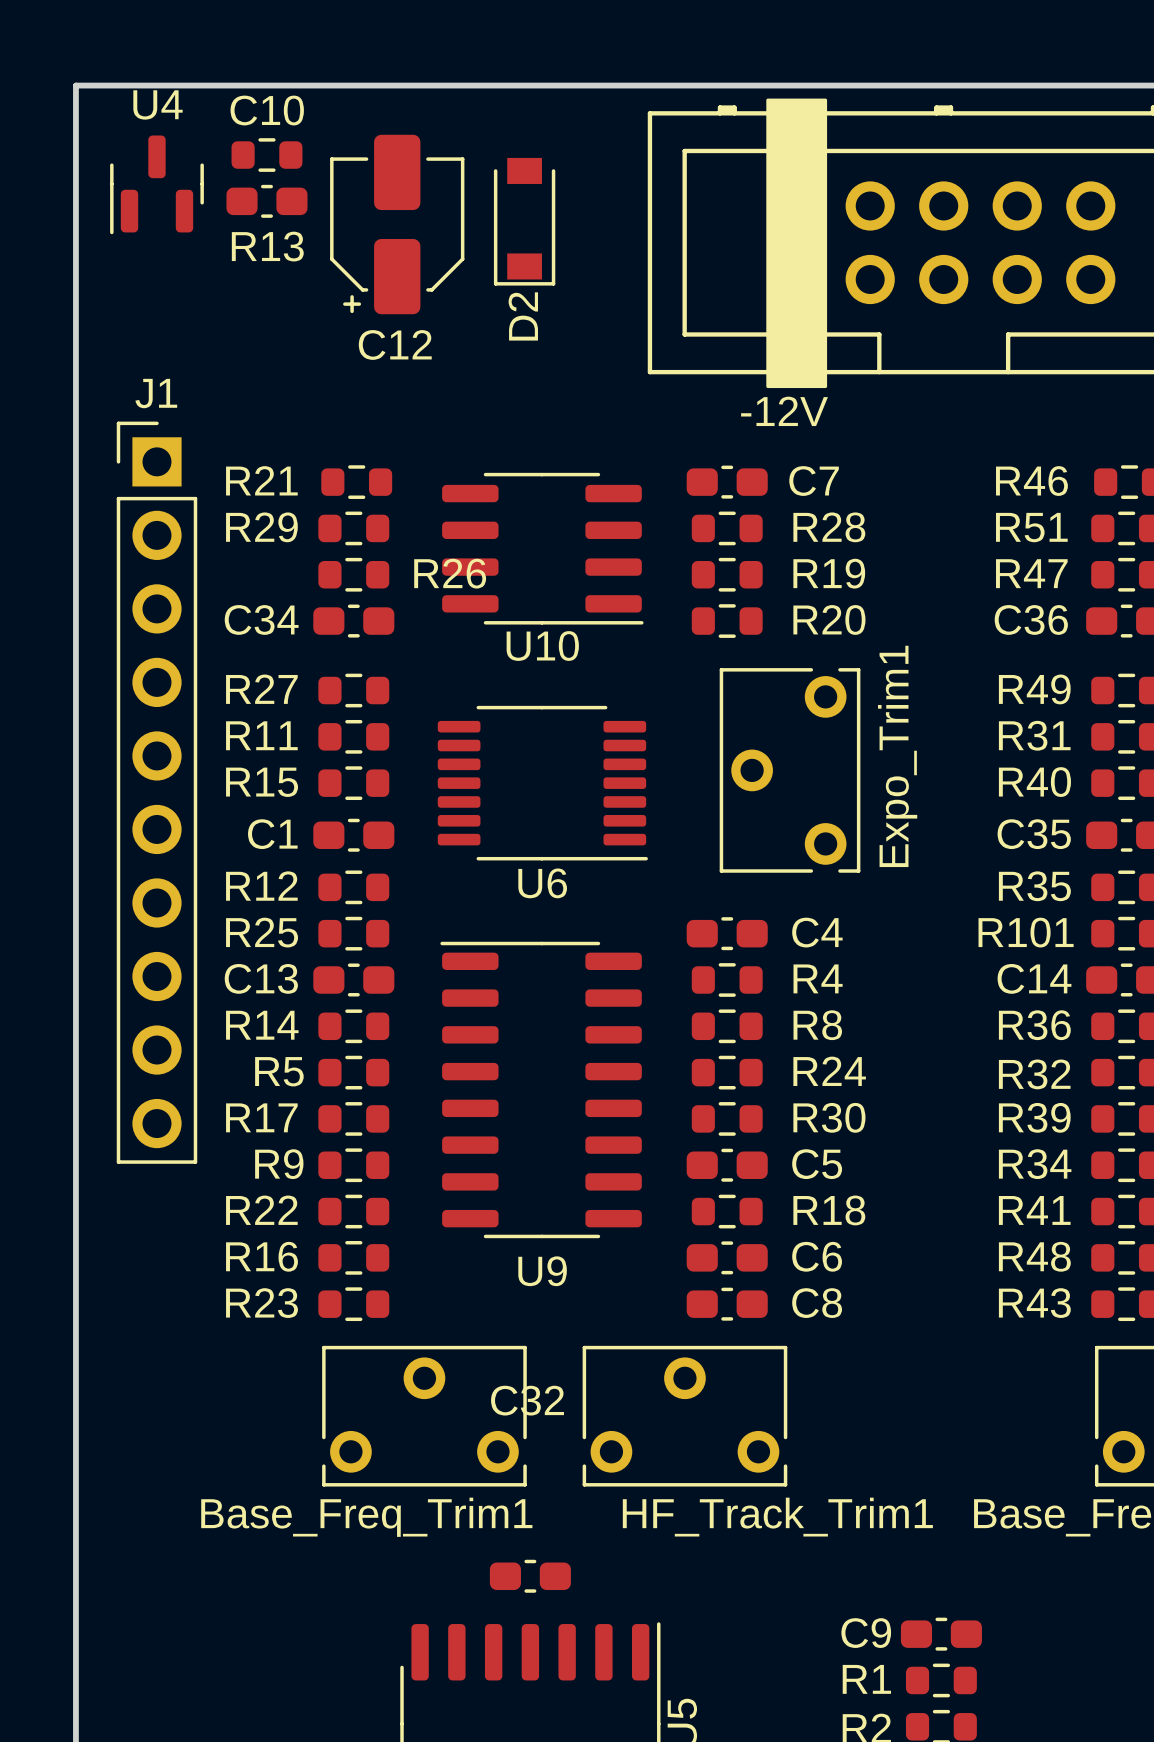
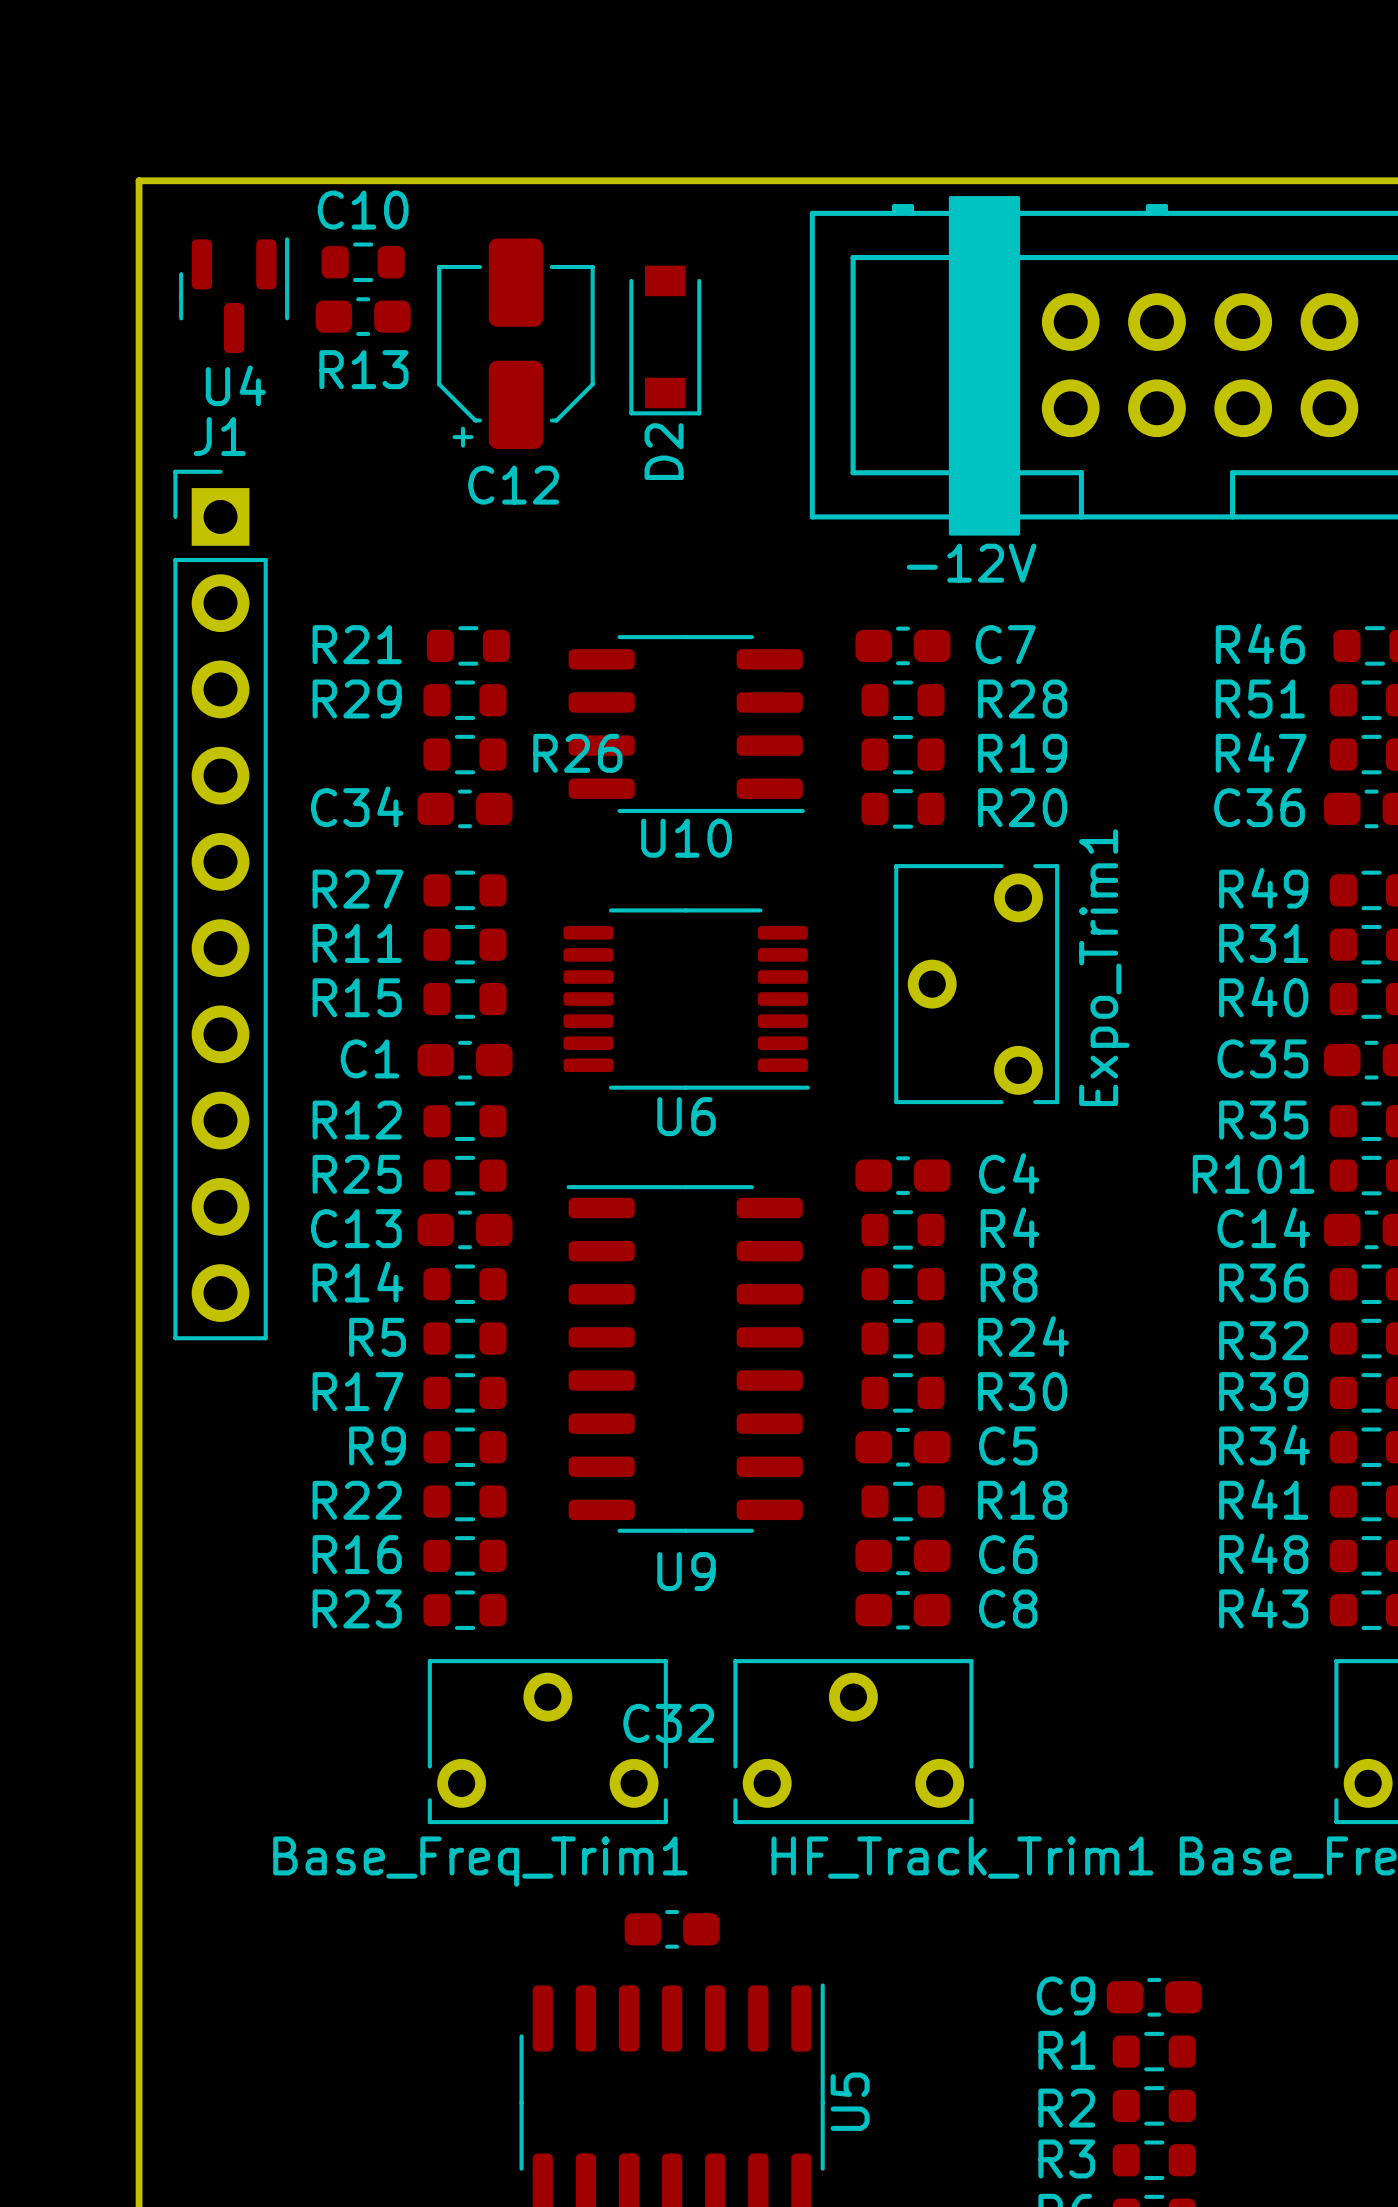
U4 rotation: 0° (156, 184) -> 180° (234, 295)
J1 position: (156, 792) -> (220, 905)

